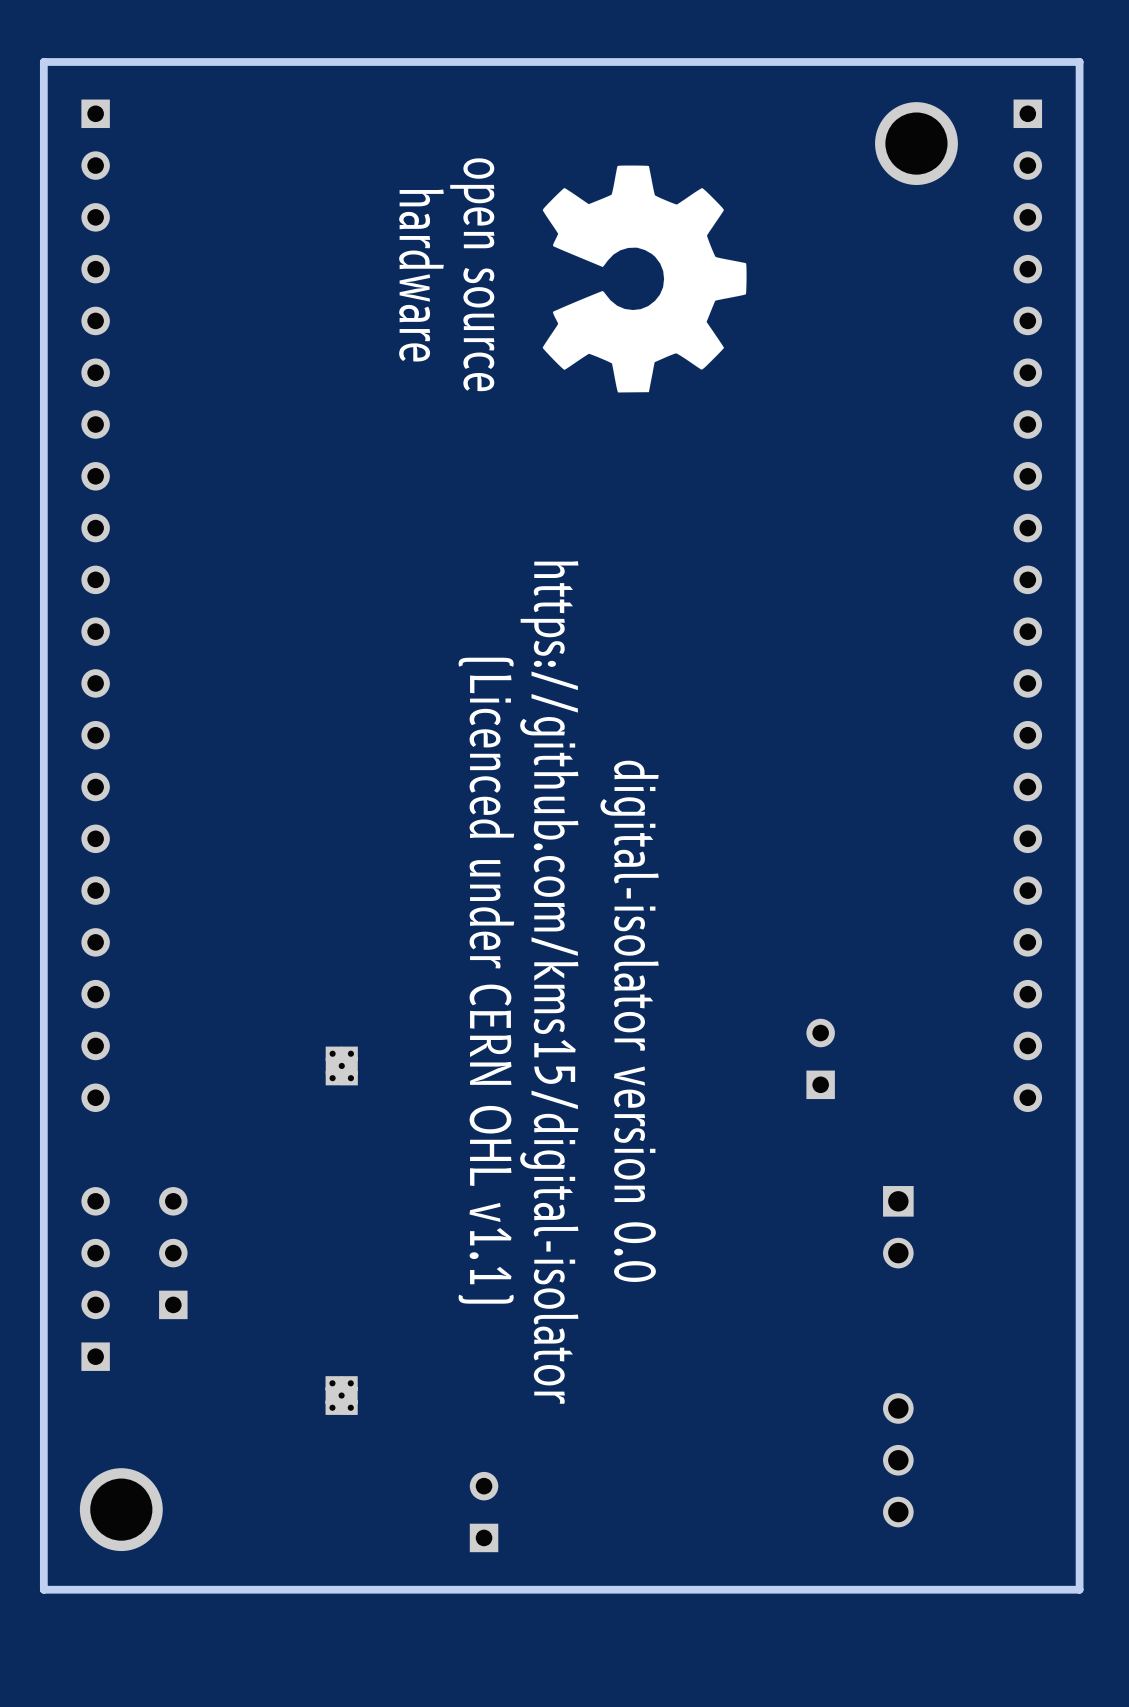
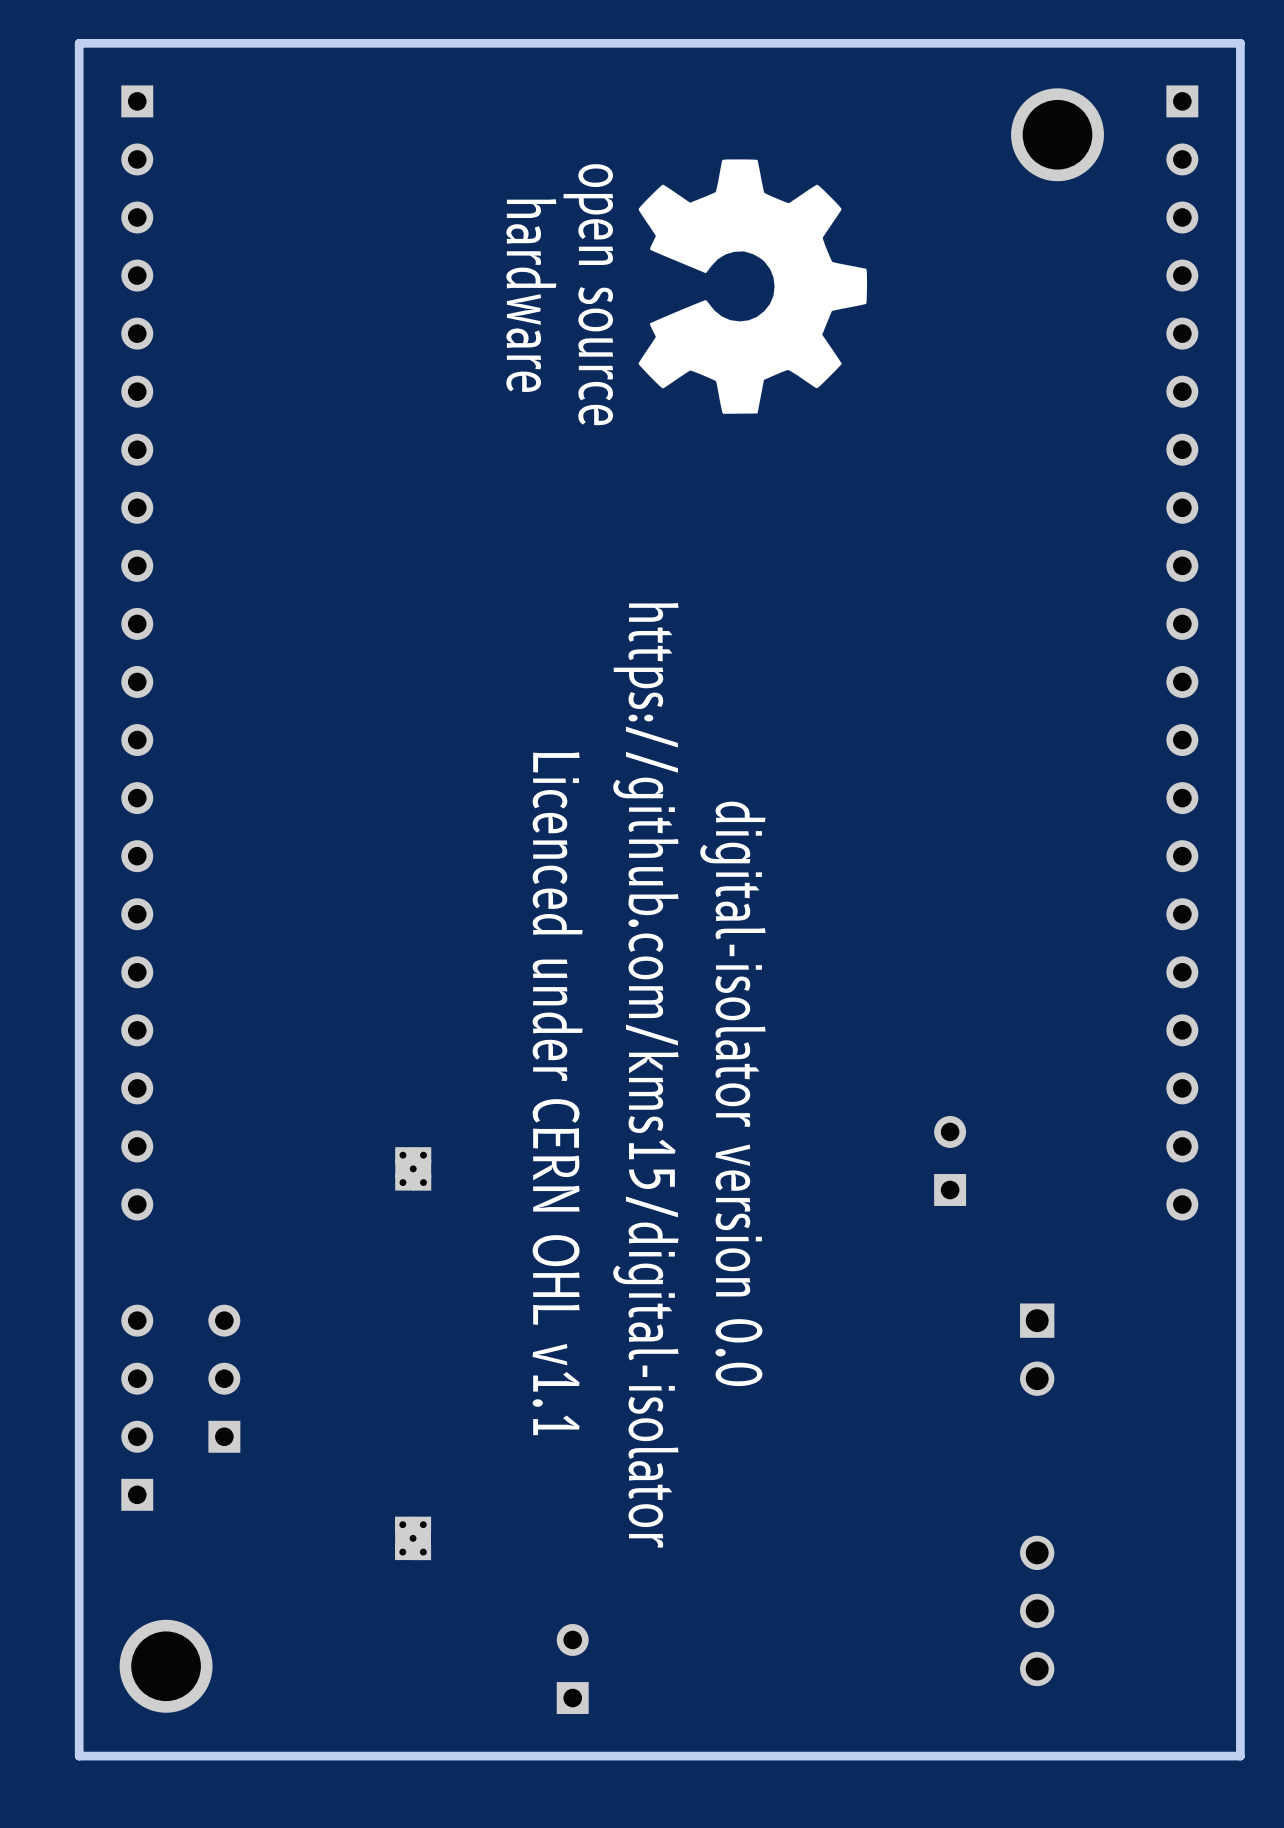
text position: open source (472, 274) -> open source (588, 294)
text position: hardware (421, 275) -> hardware (531, 295)
text: (Licenced under CERN OHL v1.1) (486, 980) -> Licenced under CERN OHL v1.1 (557, 1093)
text position: digital-isolator version 0.0 (629, 1021) -> digital-isolator version 0.0 (732, 1093)

